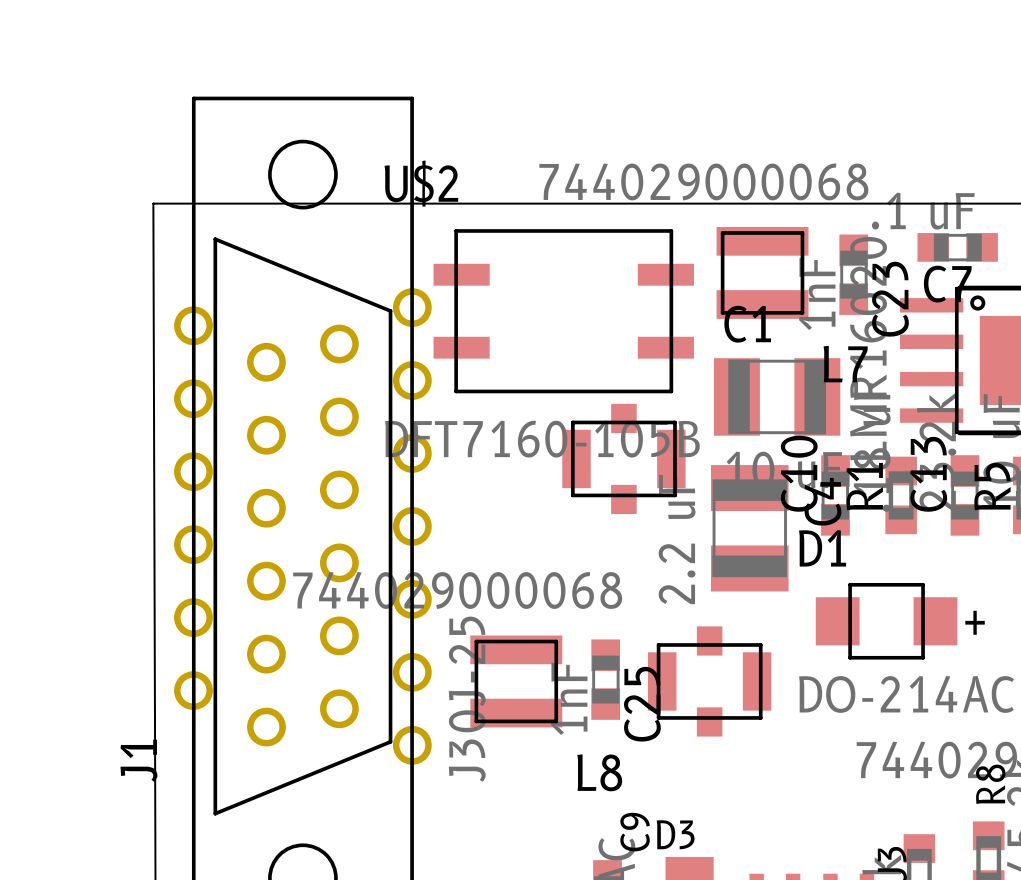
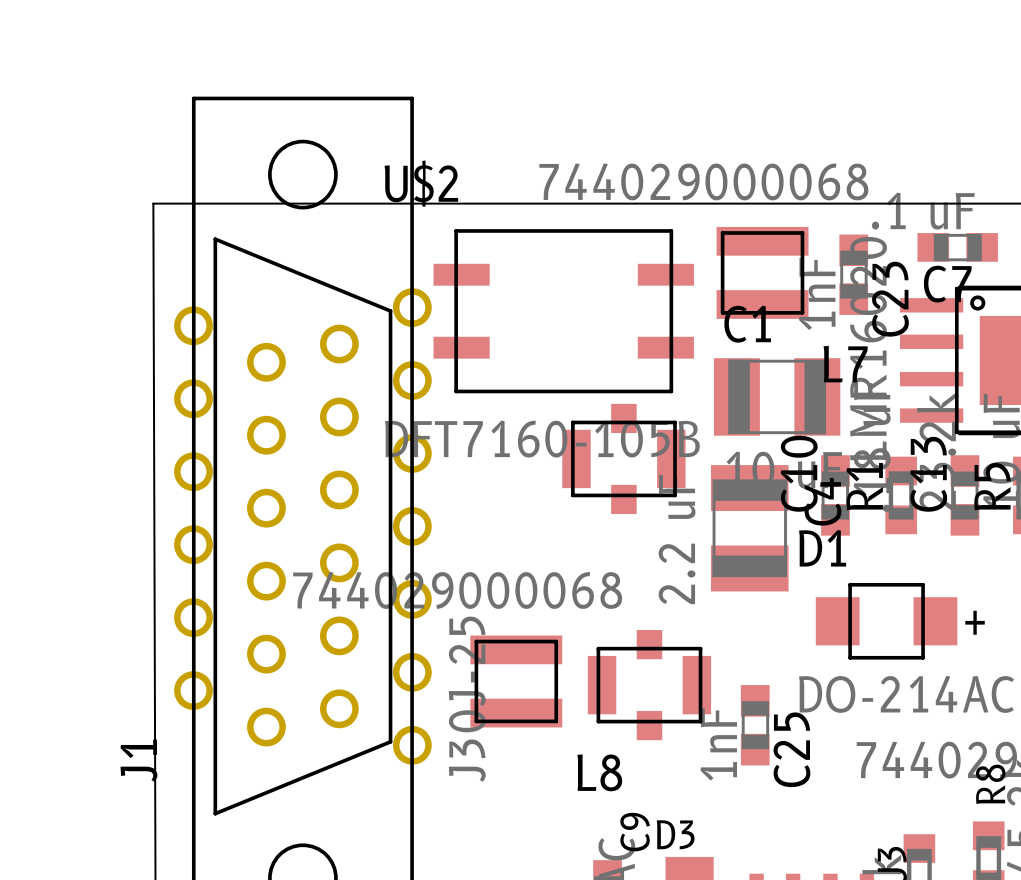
C25 position: (605, 679) -> (755, 725)
part position: (709, 681) -> (649, 685)

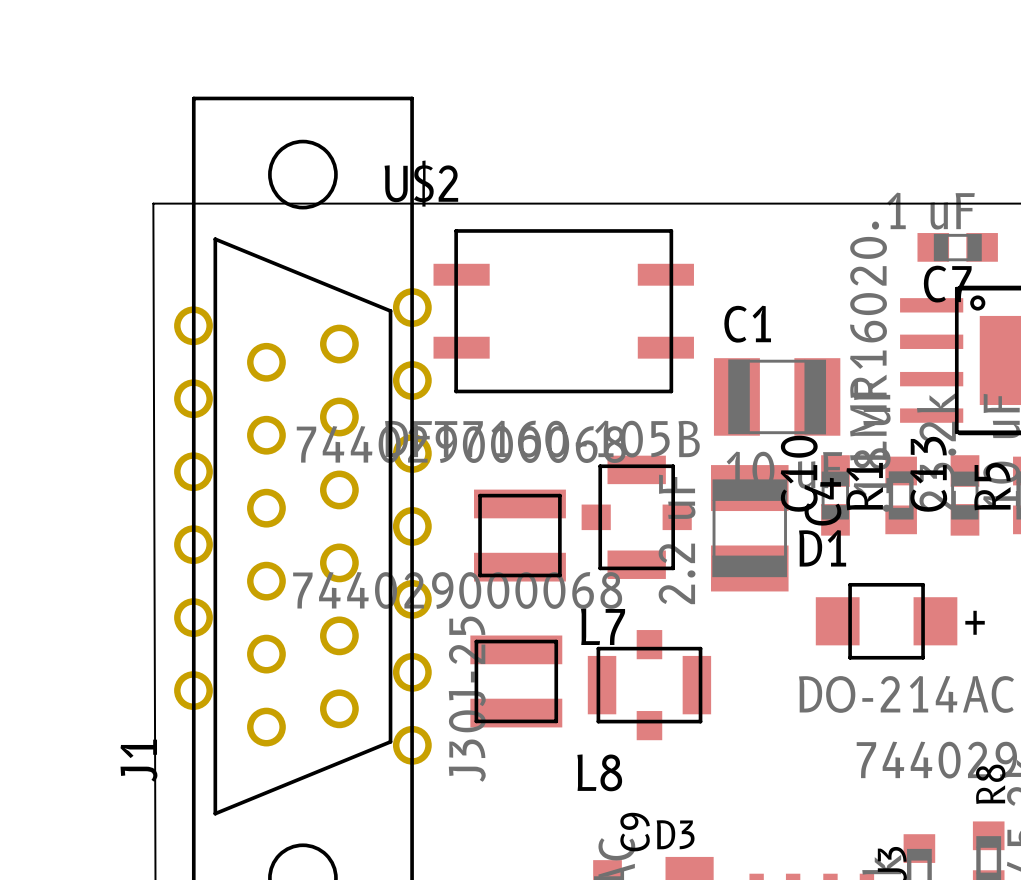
L7 position: (762, 272) -> (519, 535)
C23: 1nF (853, 274) -> none
part rotation: 0° (623, 458) -> 90° clockwise (636, 517)
C25: 1nF (755, 725) -> none

